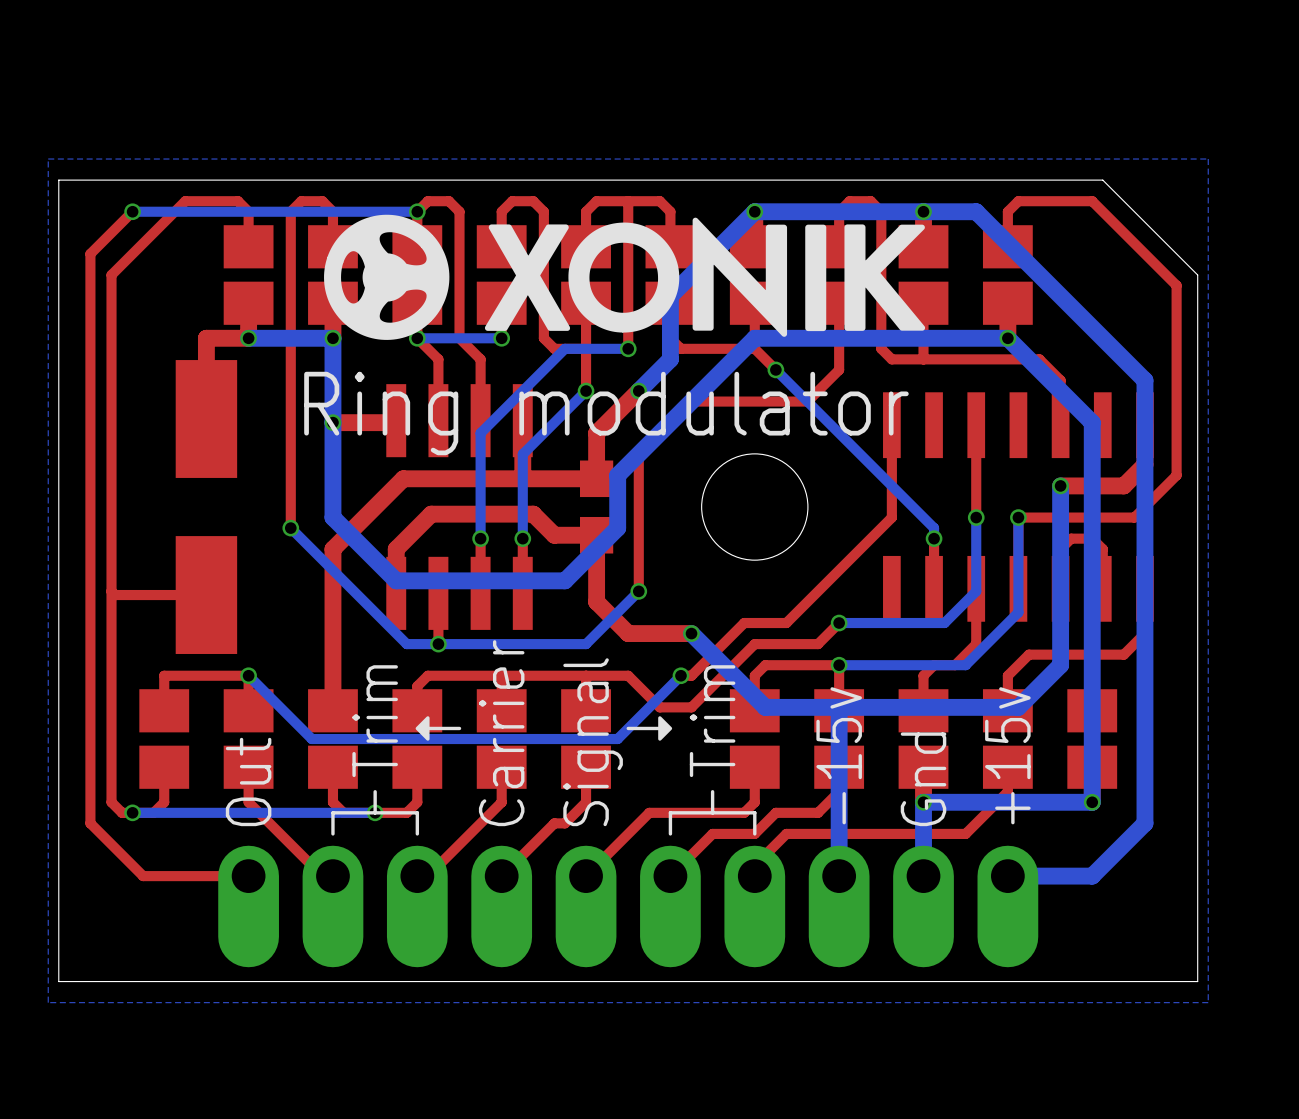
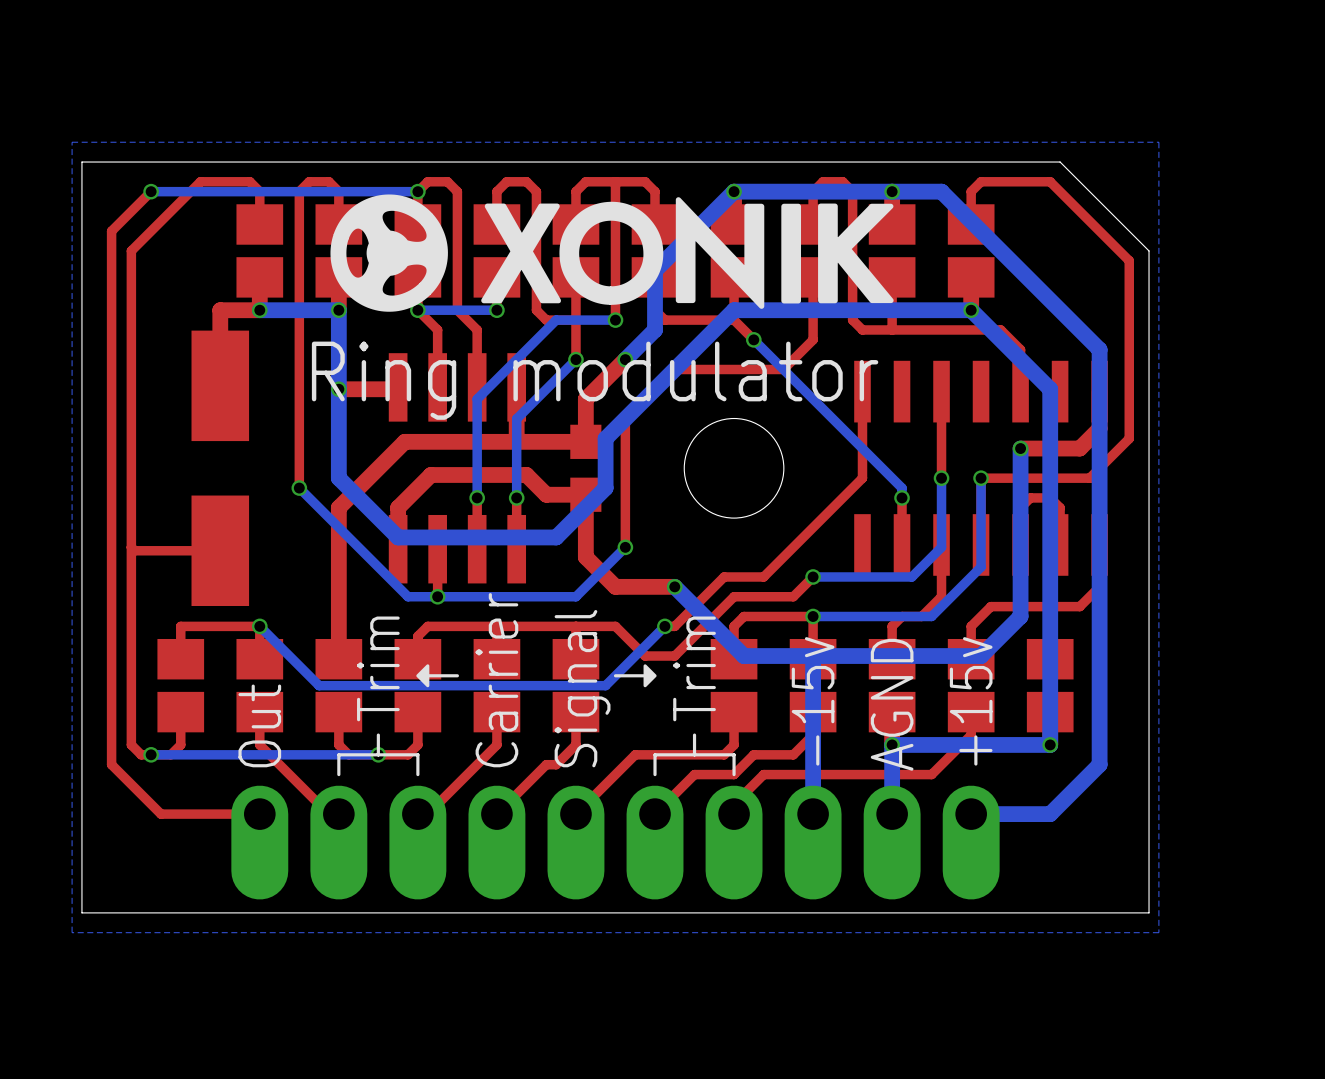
text: Gnd (923, 779) -> AGND (892, 704)

